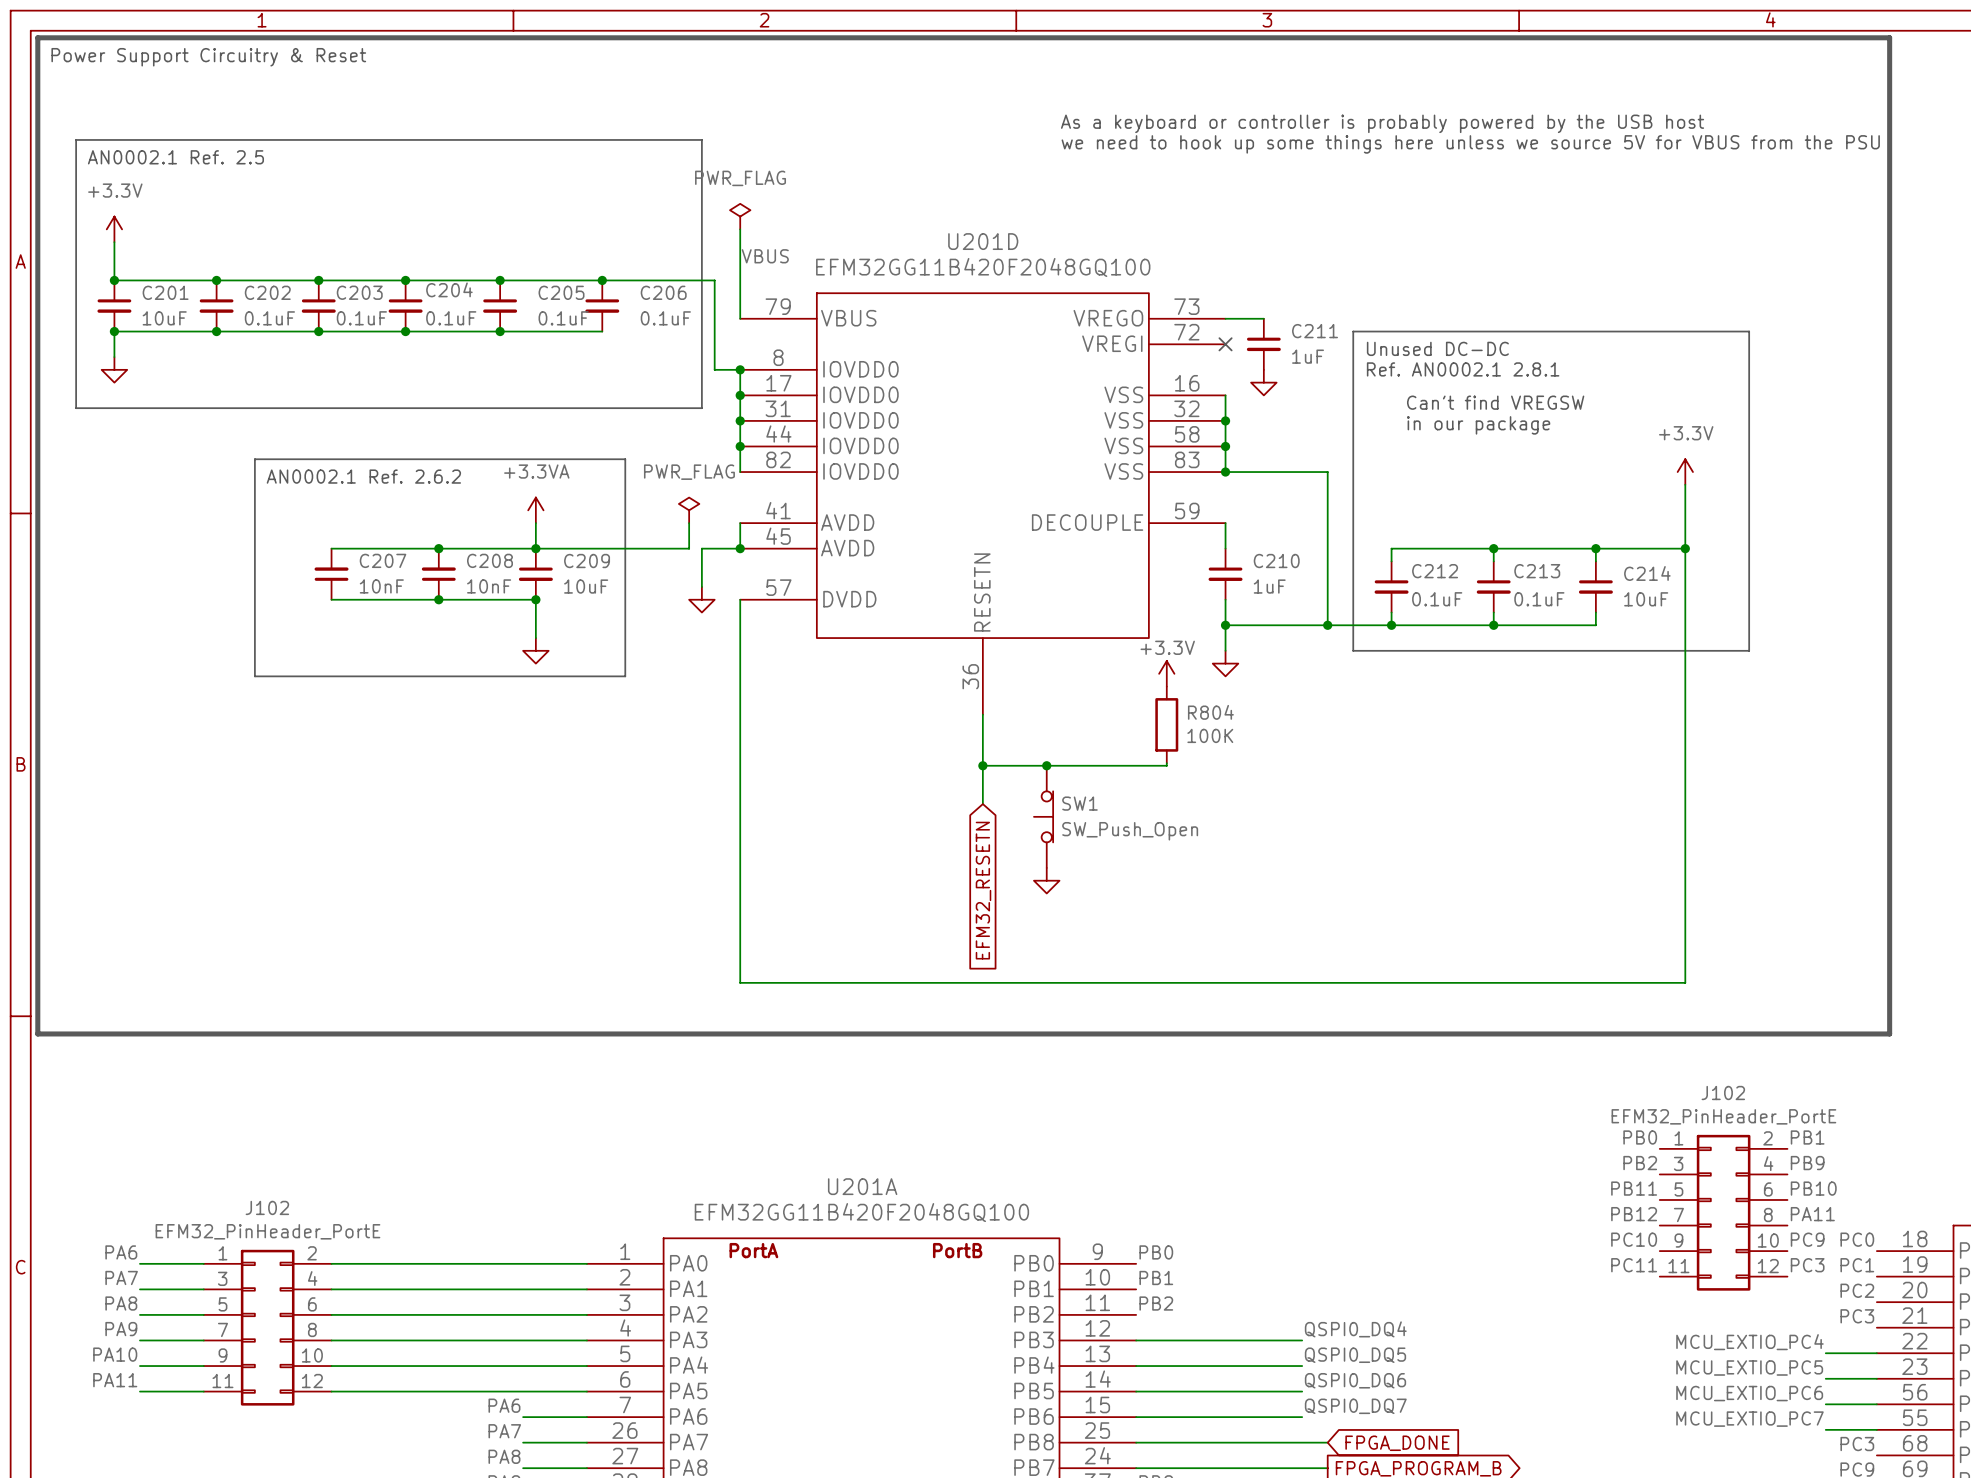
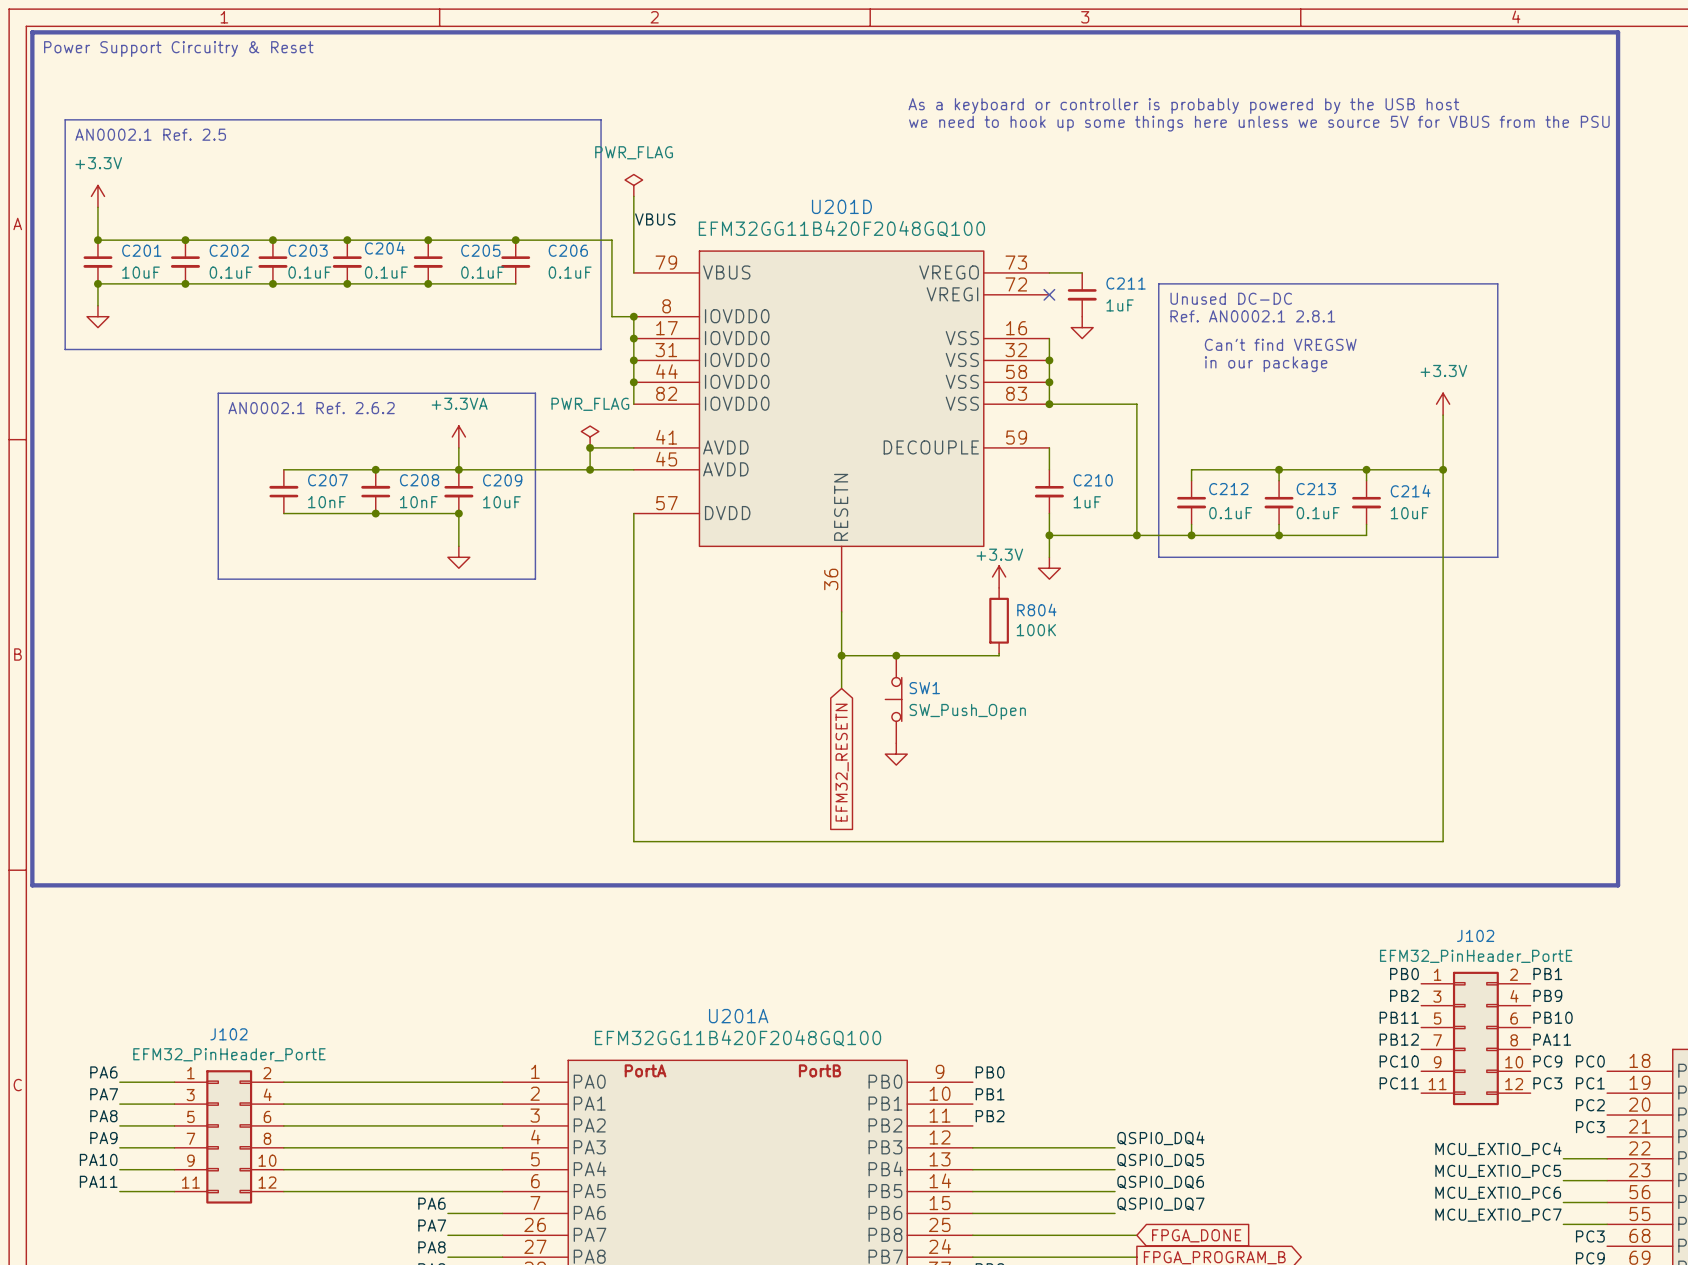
junction: none -> (590, 447)
wire: (740, 523) (740, 548) -> (633, 447) (590, 447)
junction: none -> (590, 469)
wire: (701, 548) (701, 586) -> (601, 469) (590, 469)
junction: (740, 548) -> none
power symbol: (701, 599) -> none

